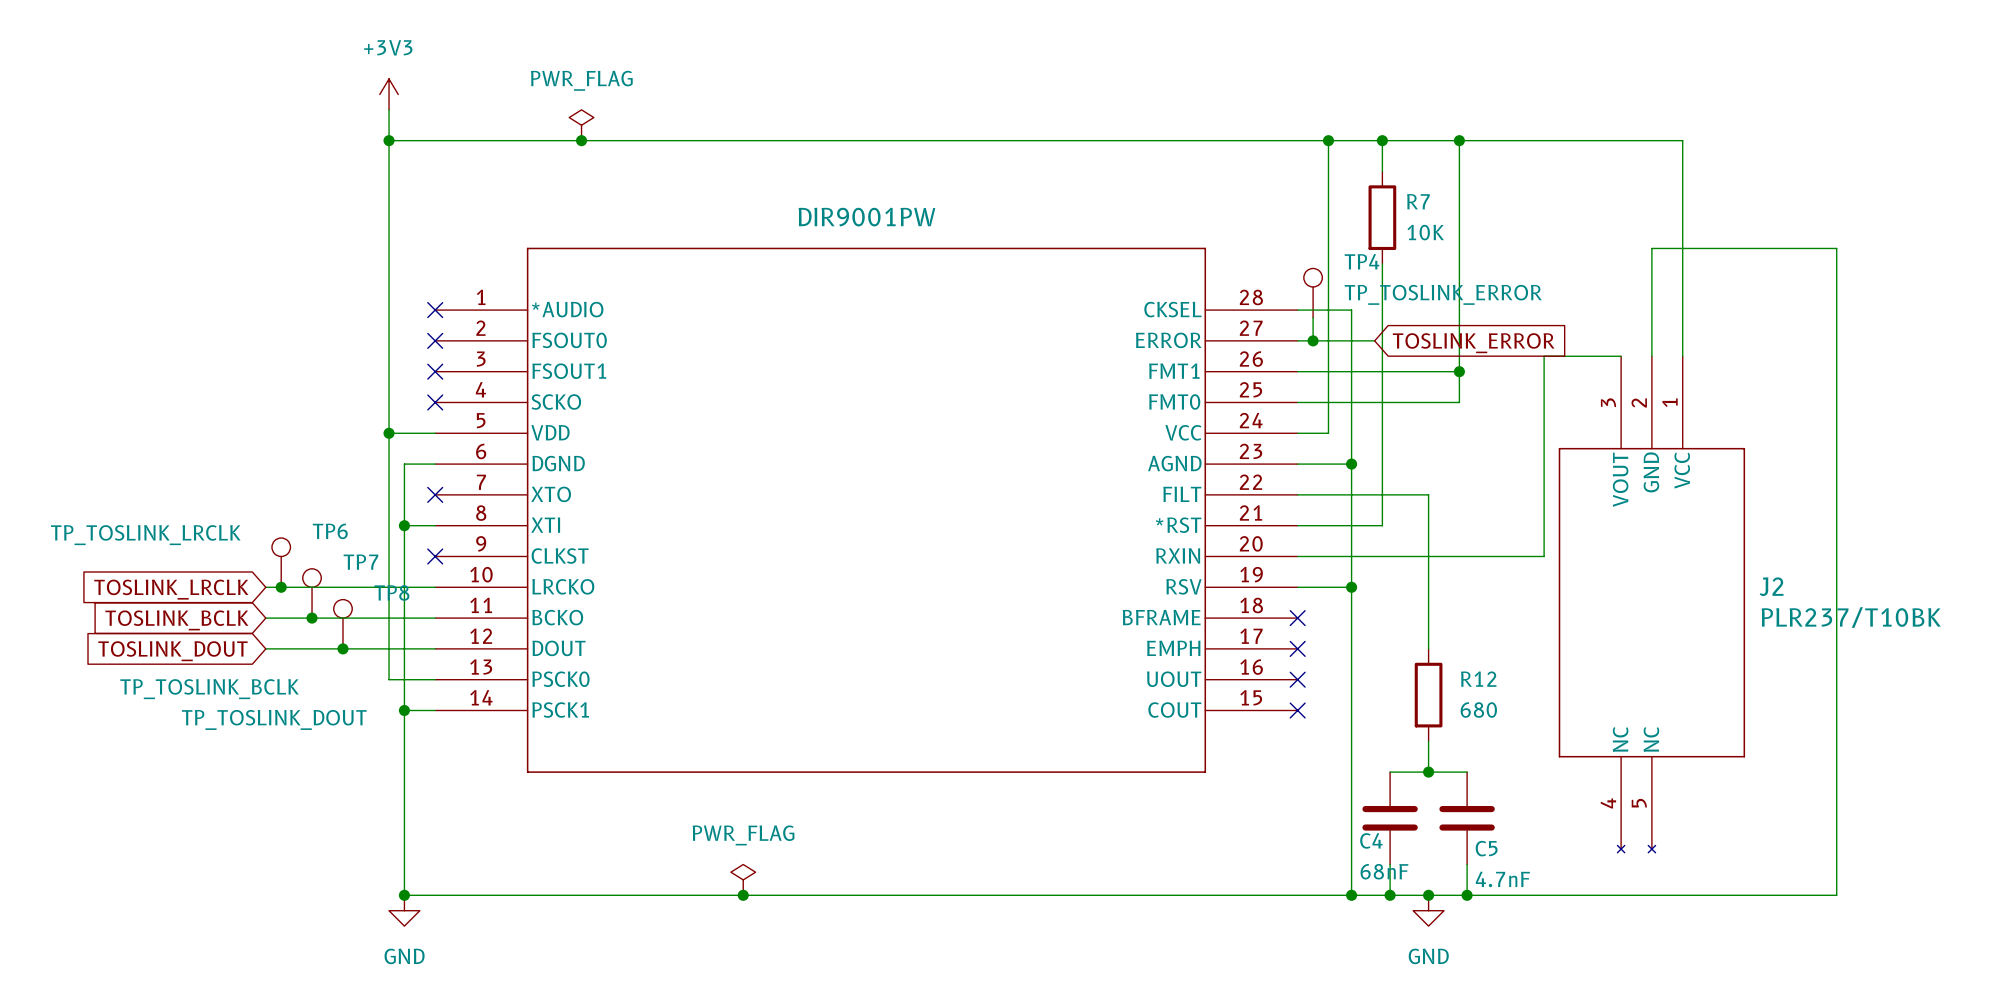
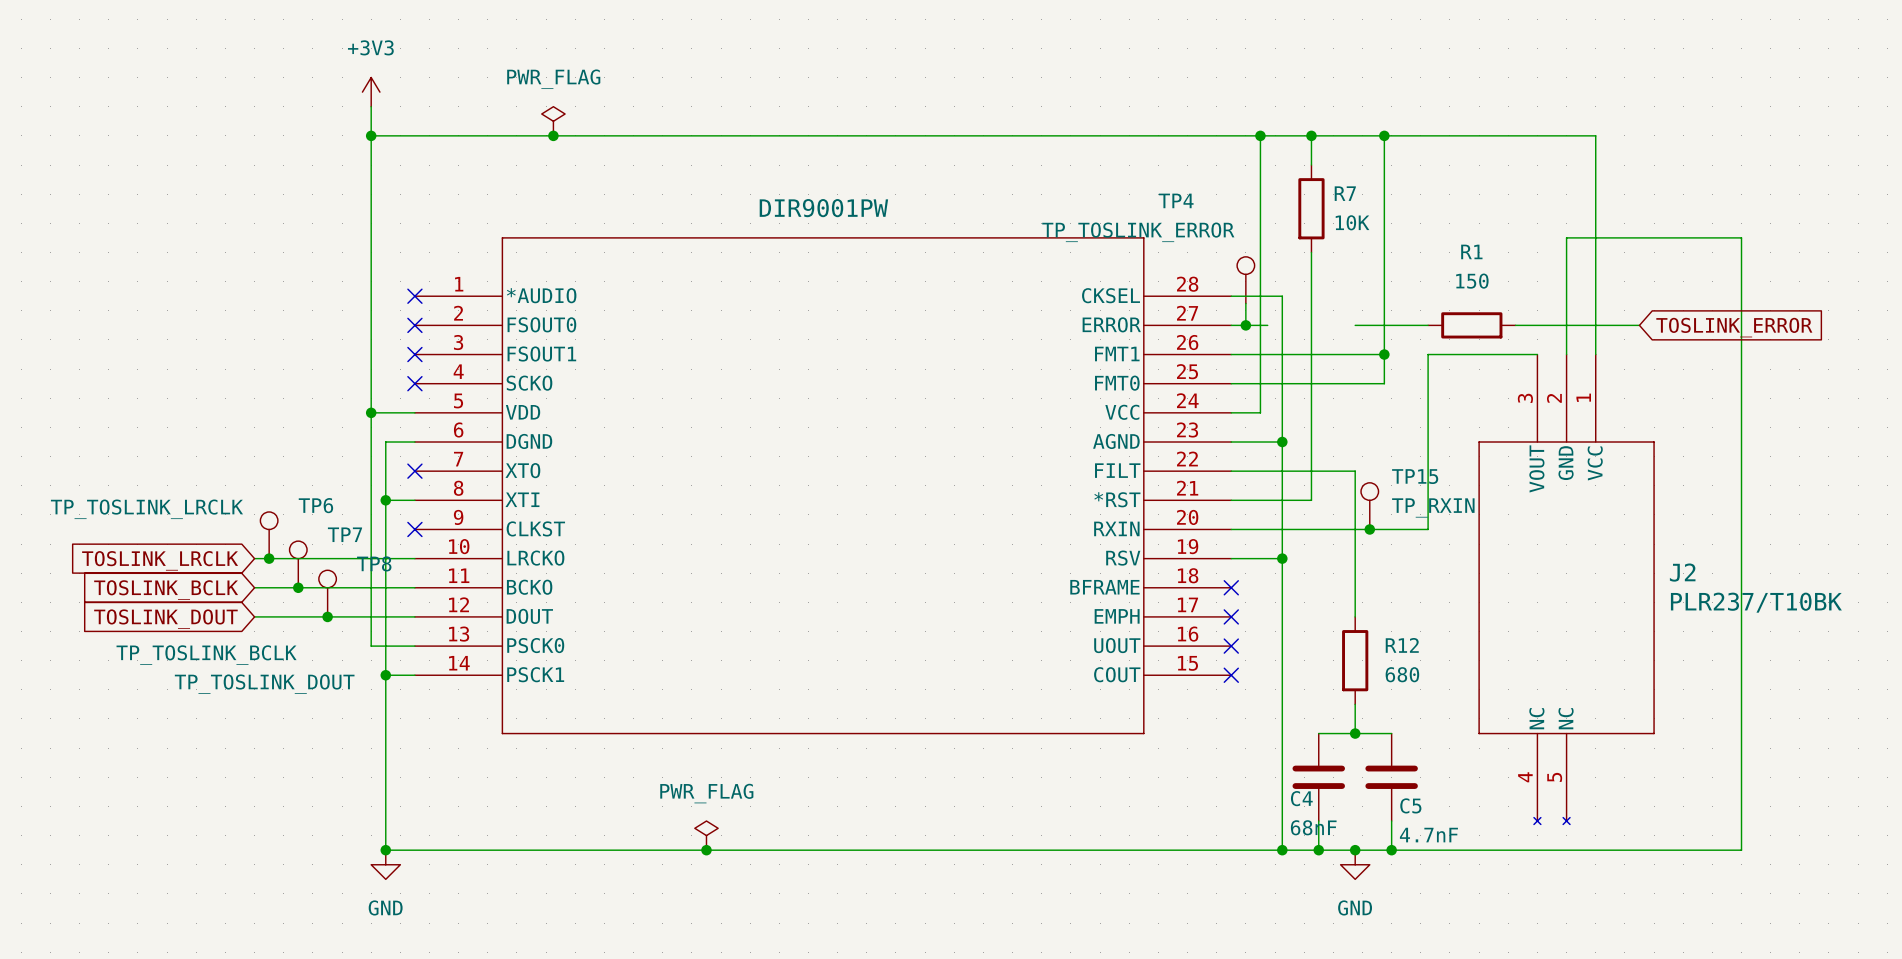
TP4 name position: TP4 (1362, 261) -> TP4 (1176, 200)
TP4 value position: TP_TOSLINK_ERROR (1443, 294) -> TP_TOSLINK_ERROR (1138, 232)
wire: (1336, 340) (1374, 340) -> none
wire: none -> (1355, 325) (1428, 325)
R1: none -> 150 (1471, 325)
wire: none -> (1515, 325) (1639, 325)
global label: TOSLINK_ERROR (1473, 343) -> none
global label: none -> TOSLINK_ERROR (1734, 327)
wire: (1621, 356) (1544, 356) (1544, 556) (1505, 556) -> (1537, 354) (1428, 354) (1428, 529)
TP15: none -> TP_RXIN (1369, 506)
junction: none -> (1369, 529)
J2 position: (1651, 604) -> (1566, 589)

